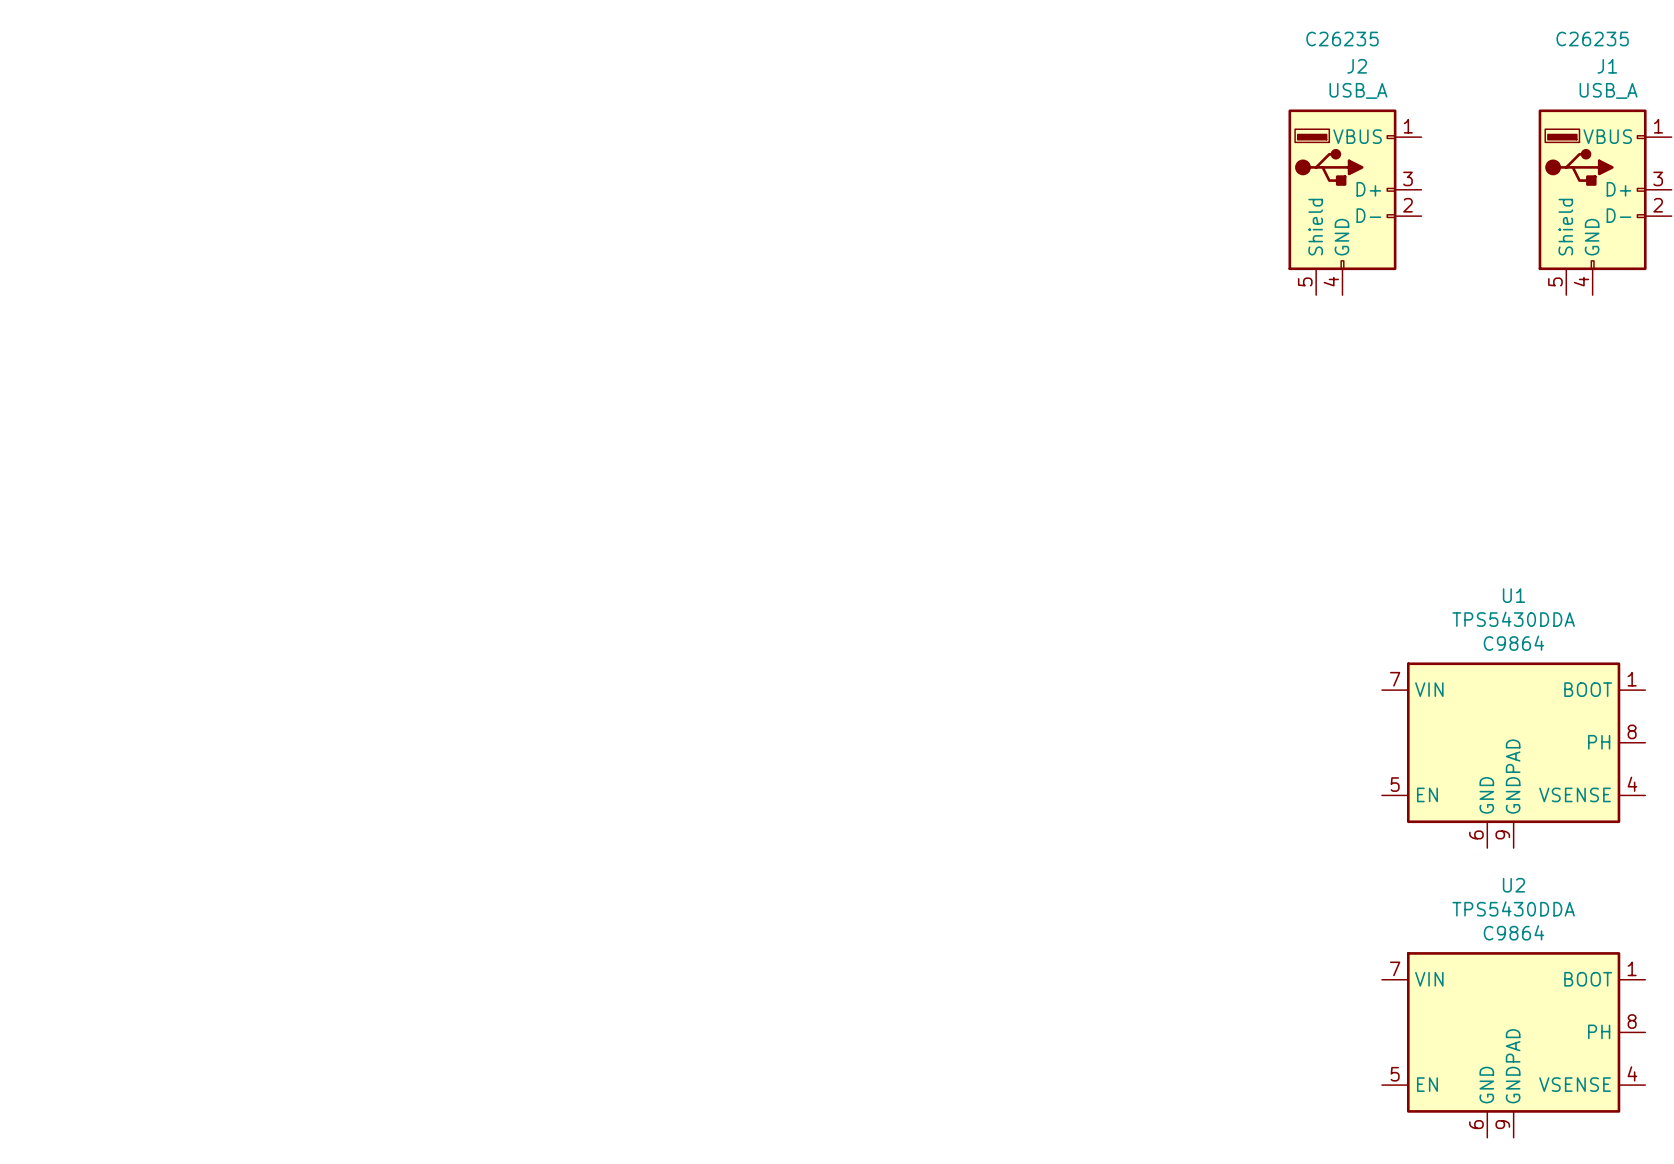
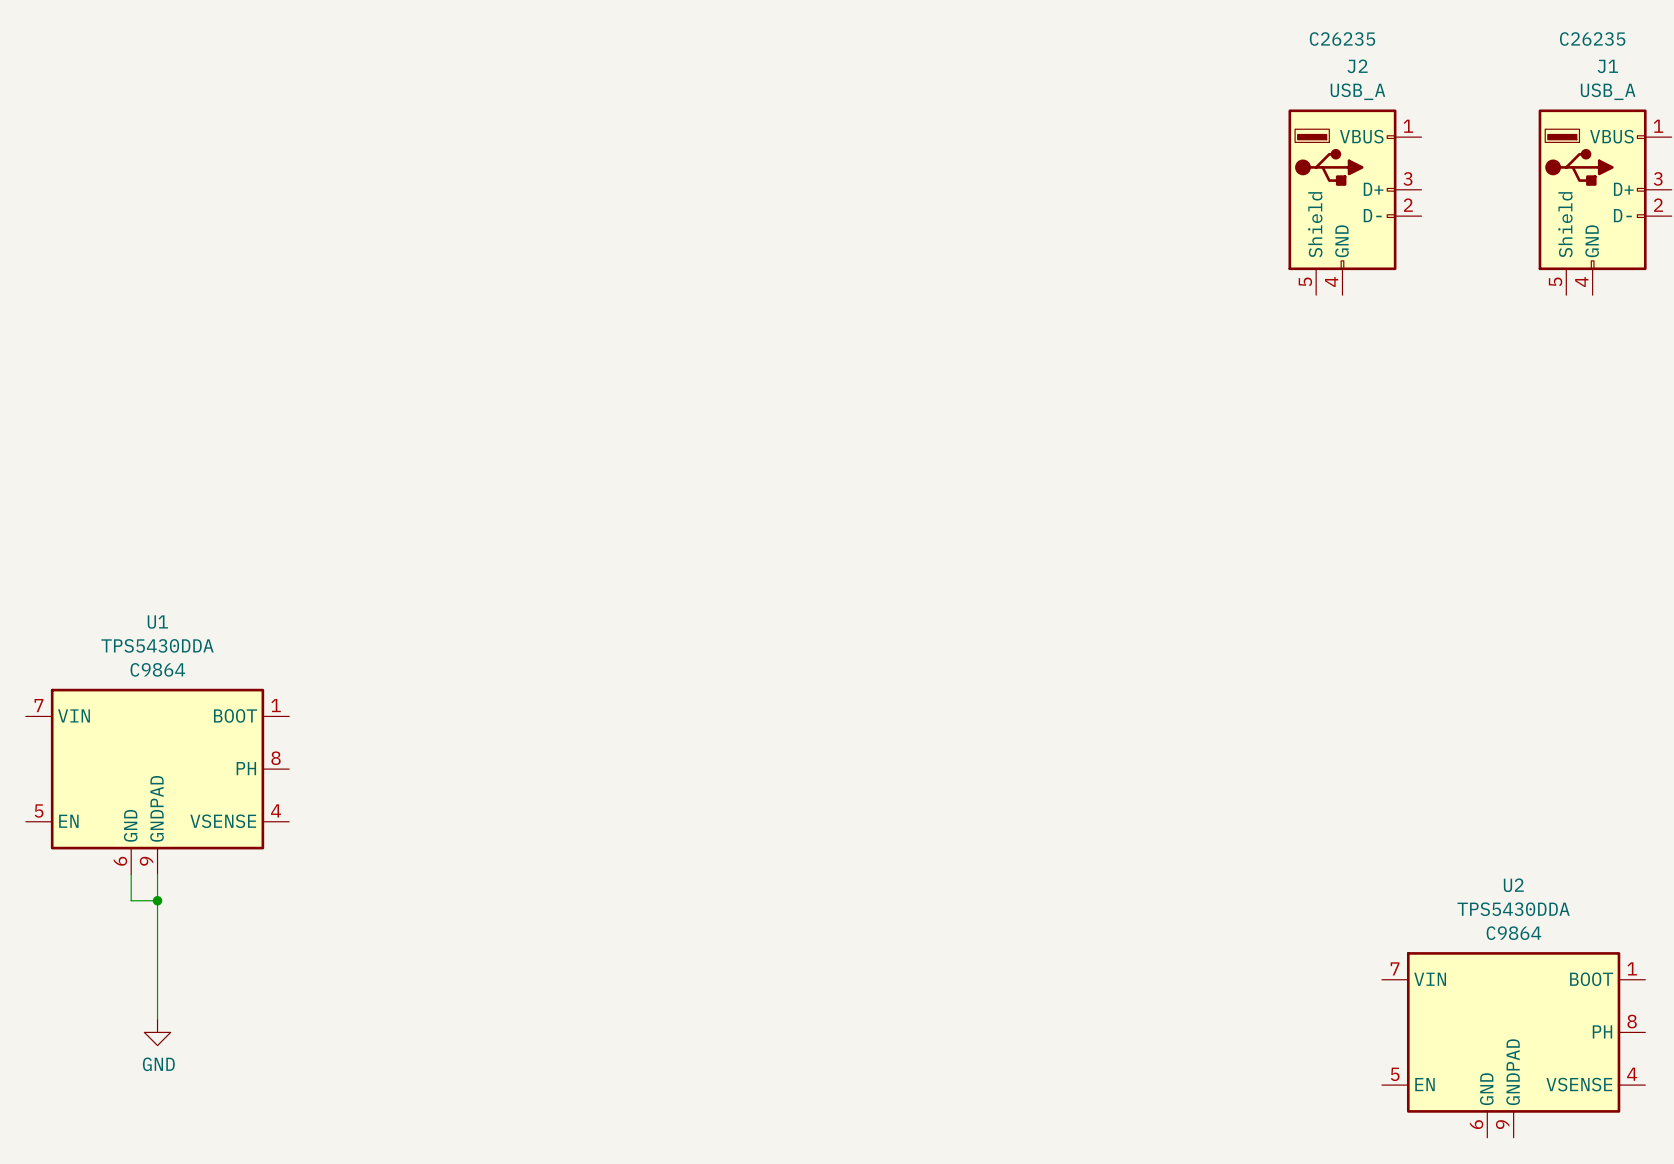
U1 position: (1513, 755) -> (157, 781)
wire: none -> (131, 874) (131, 900) (157, 900)
wire: none -> (157, 874) (157, 1019)
junction: none -> (157, 900)
power symbol: none -> GND (157, 1032)

